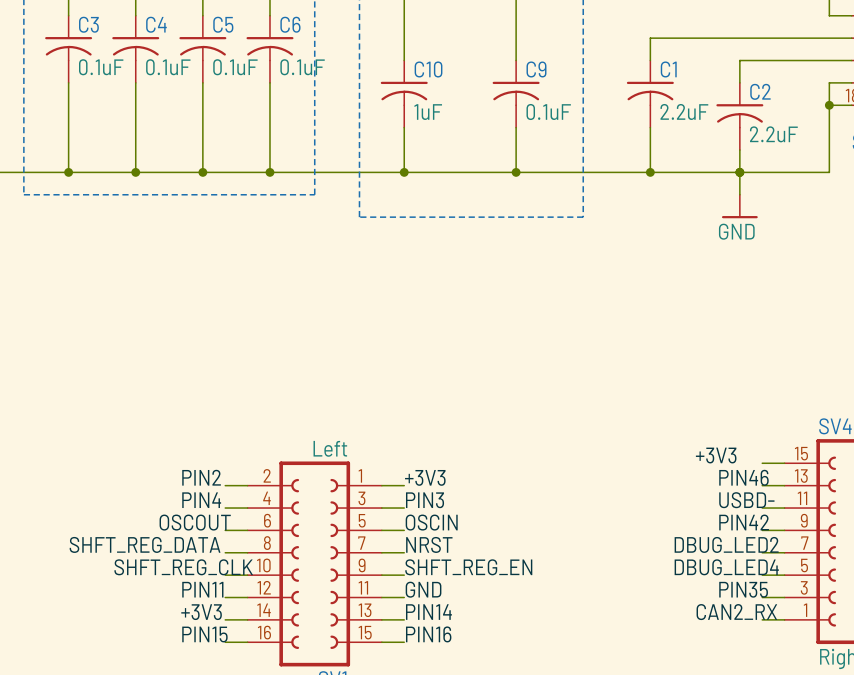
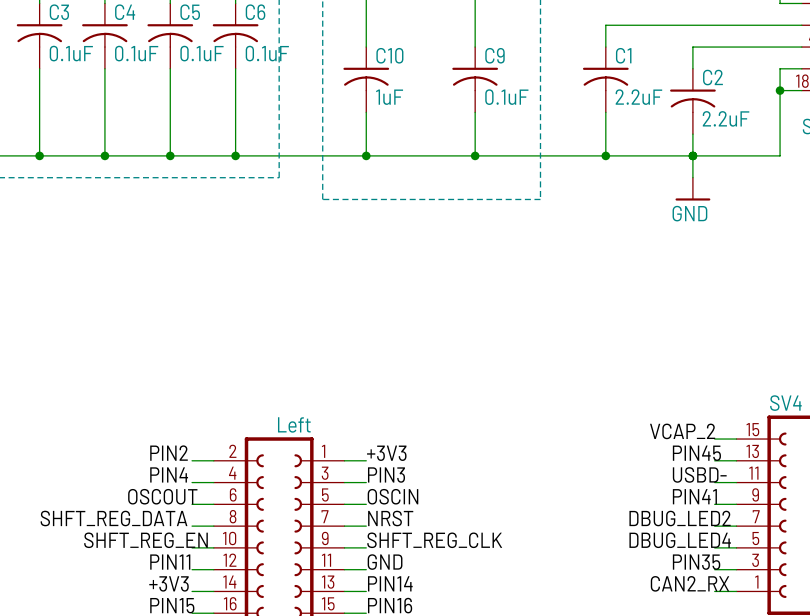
label: +3V3 (716, 455) -> VCAP_2 (682, 431)
label: PIN46 (743, 477) -> PIN45 (696, 453)
label: PIN42 (744, 522) -> PIN41 (694, 496)
label: SHFT_REG_CLK (183, 567) -> SHFT_REG_EN (146, 540)
label: SHFT_REG_EN (468, 567) -> SHFT_REG_CLK (434, 540)

